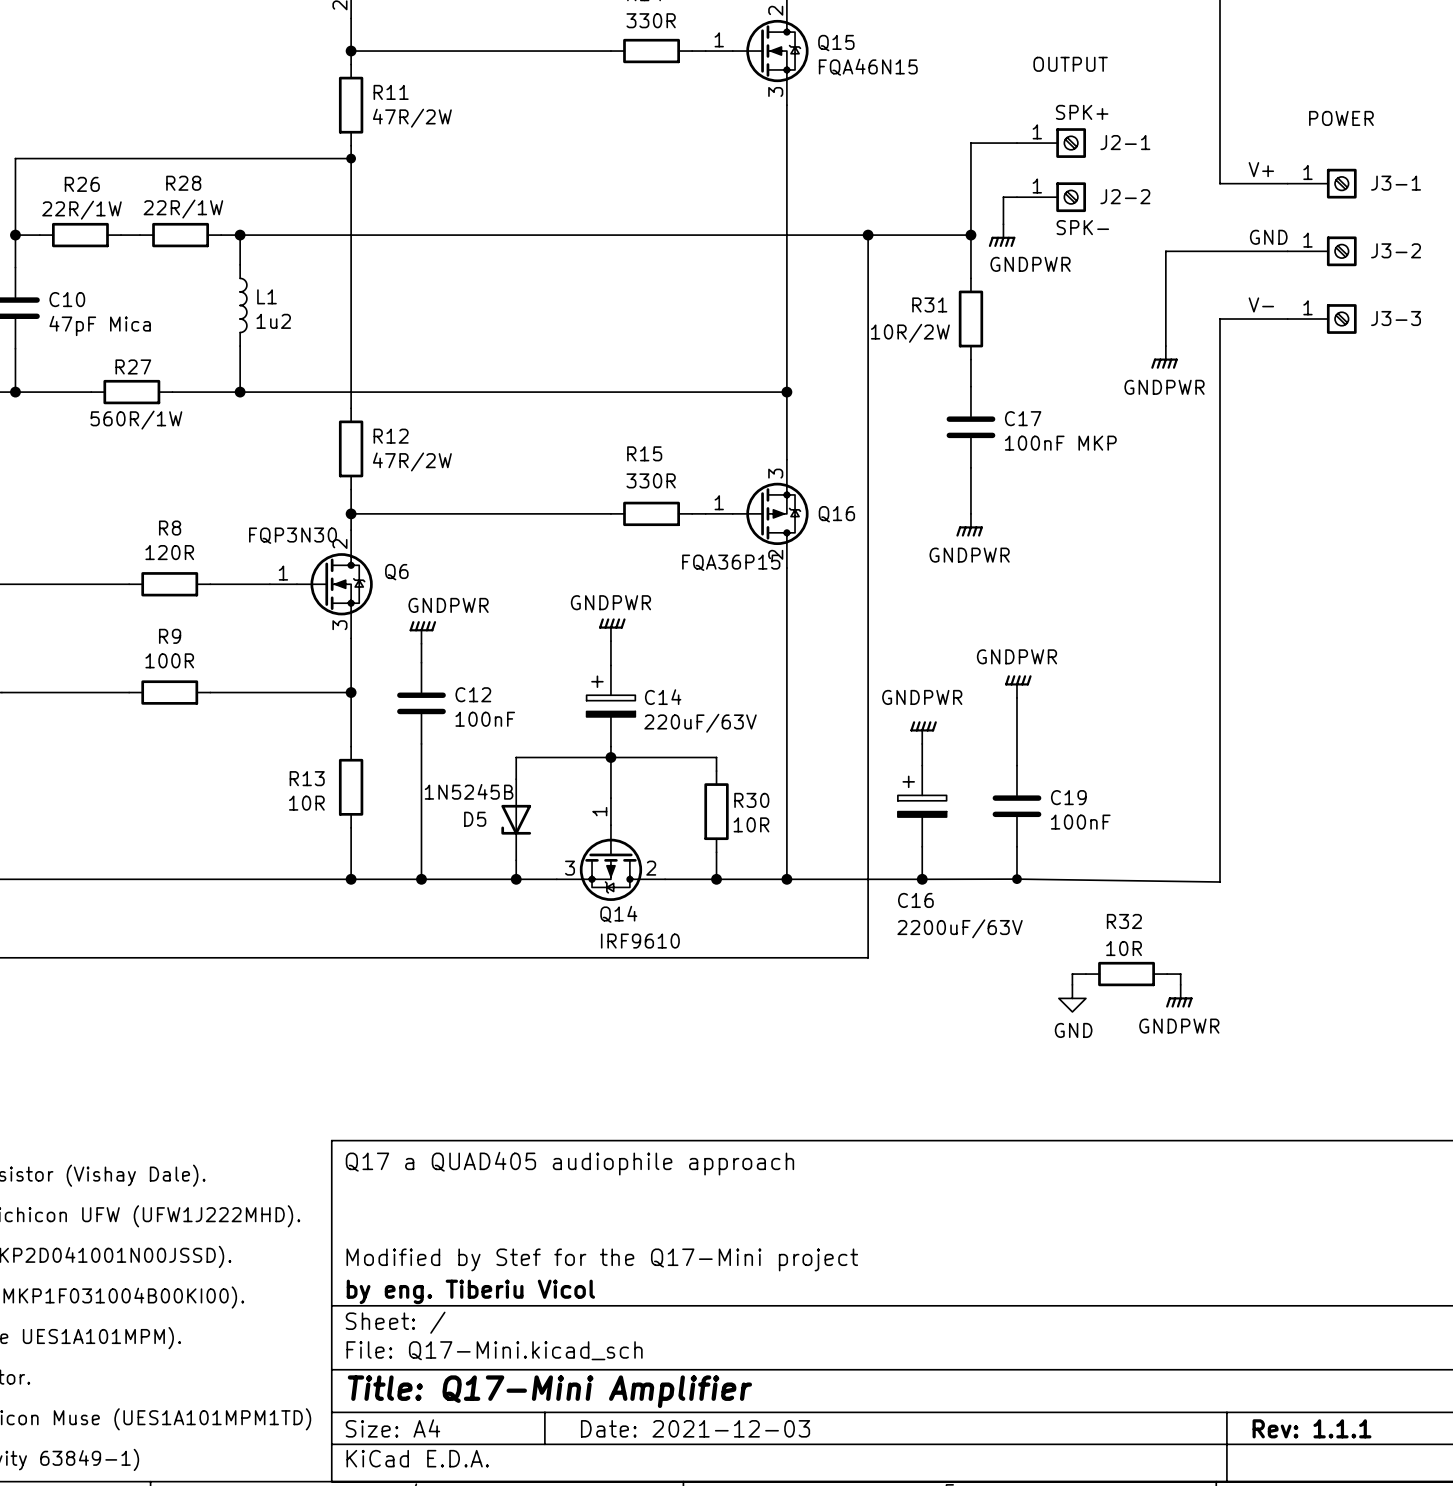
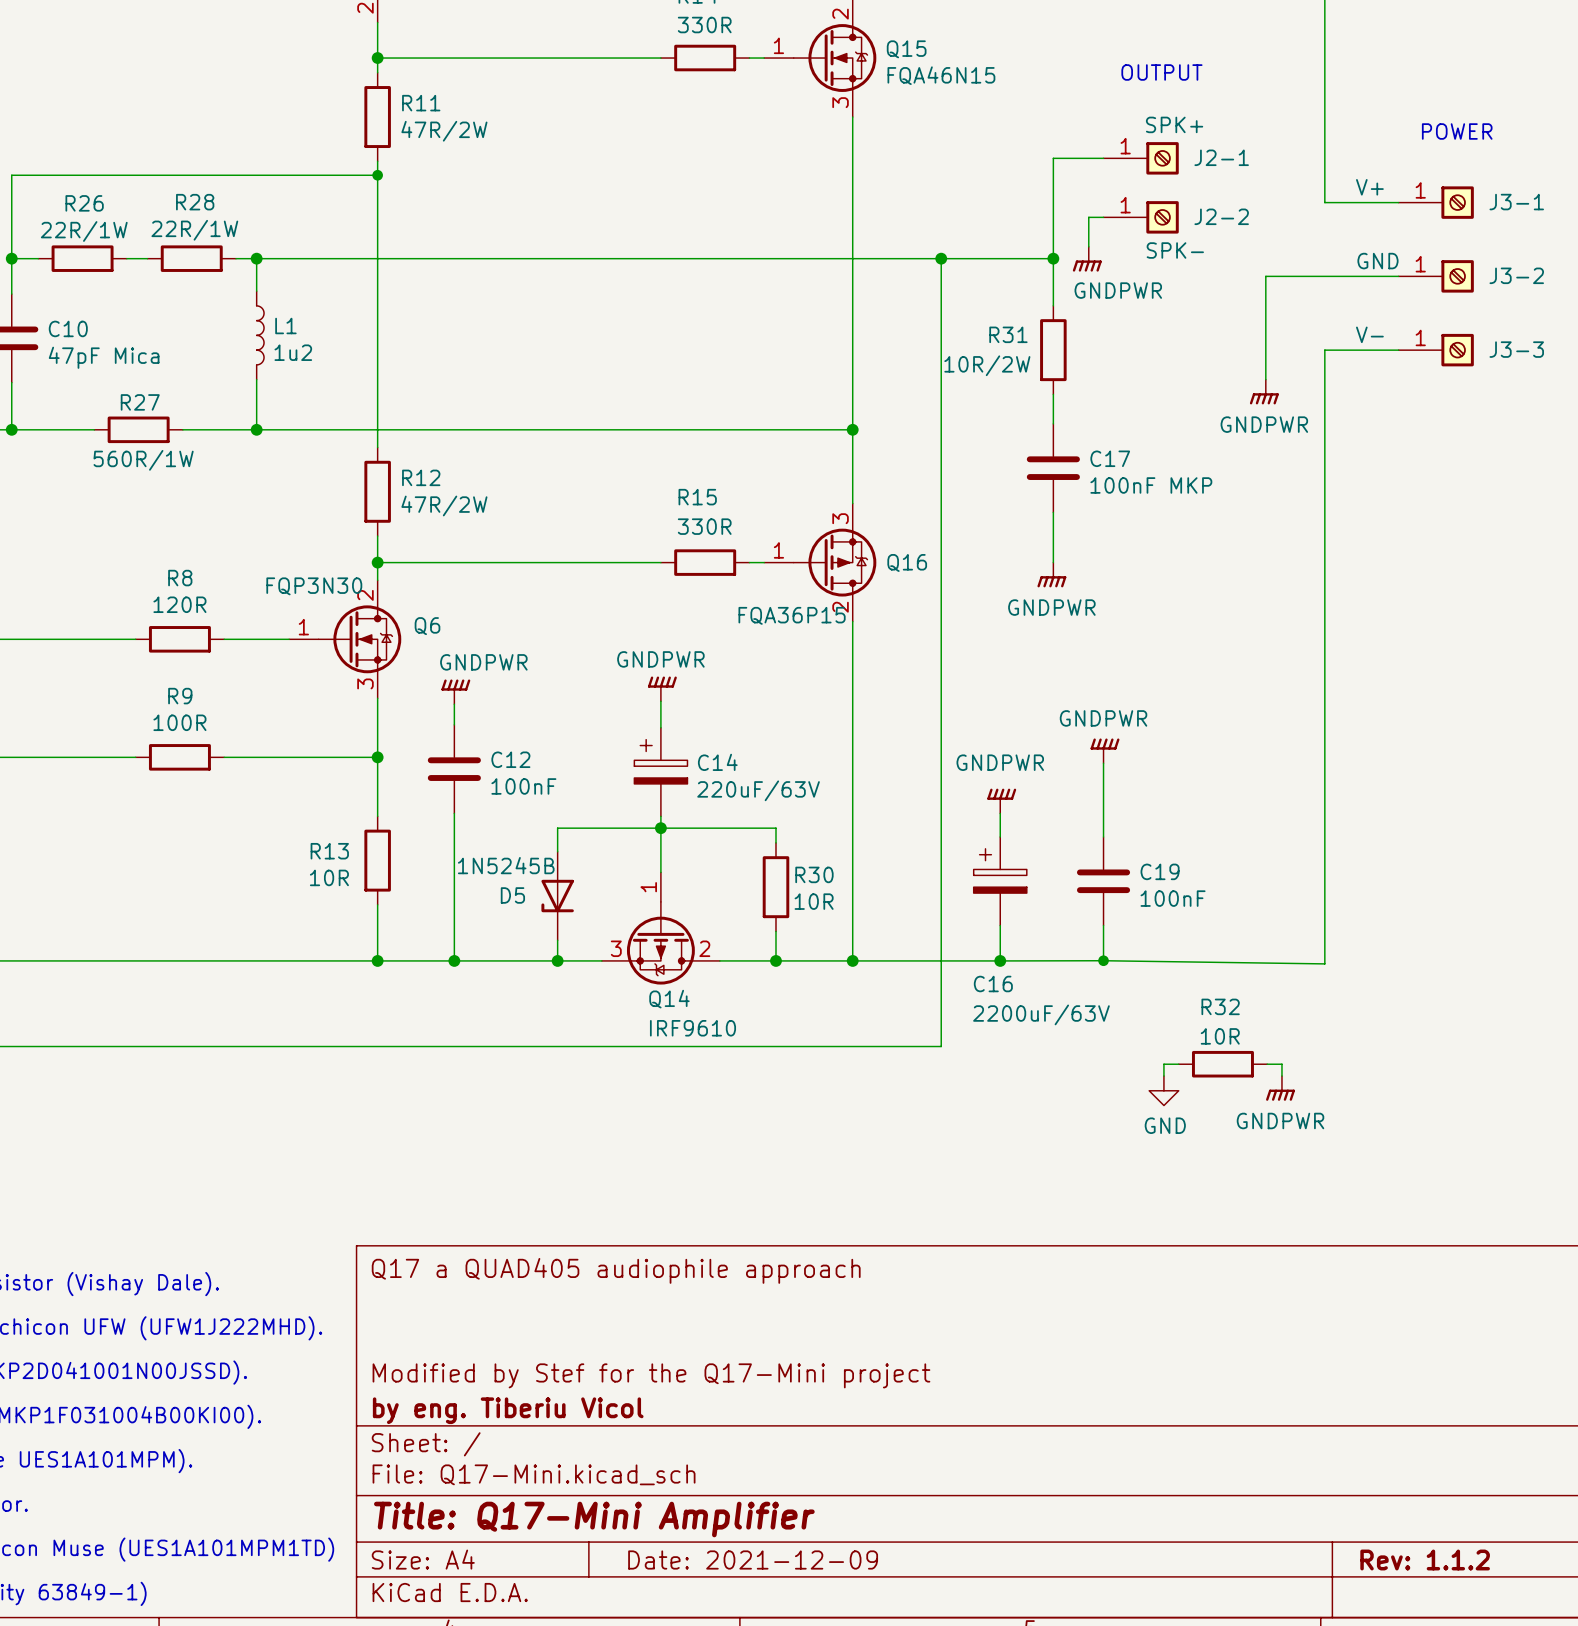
title block: Date: 2021-12-03 (695, 1428) -> Date: 2021-12-09 (753, 1559)
title block: Rev: 1.1.1 (1311, 1428) -> Rev: 1.1.2 (1425, 1559)

